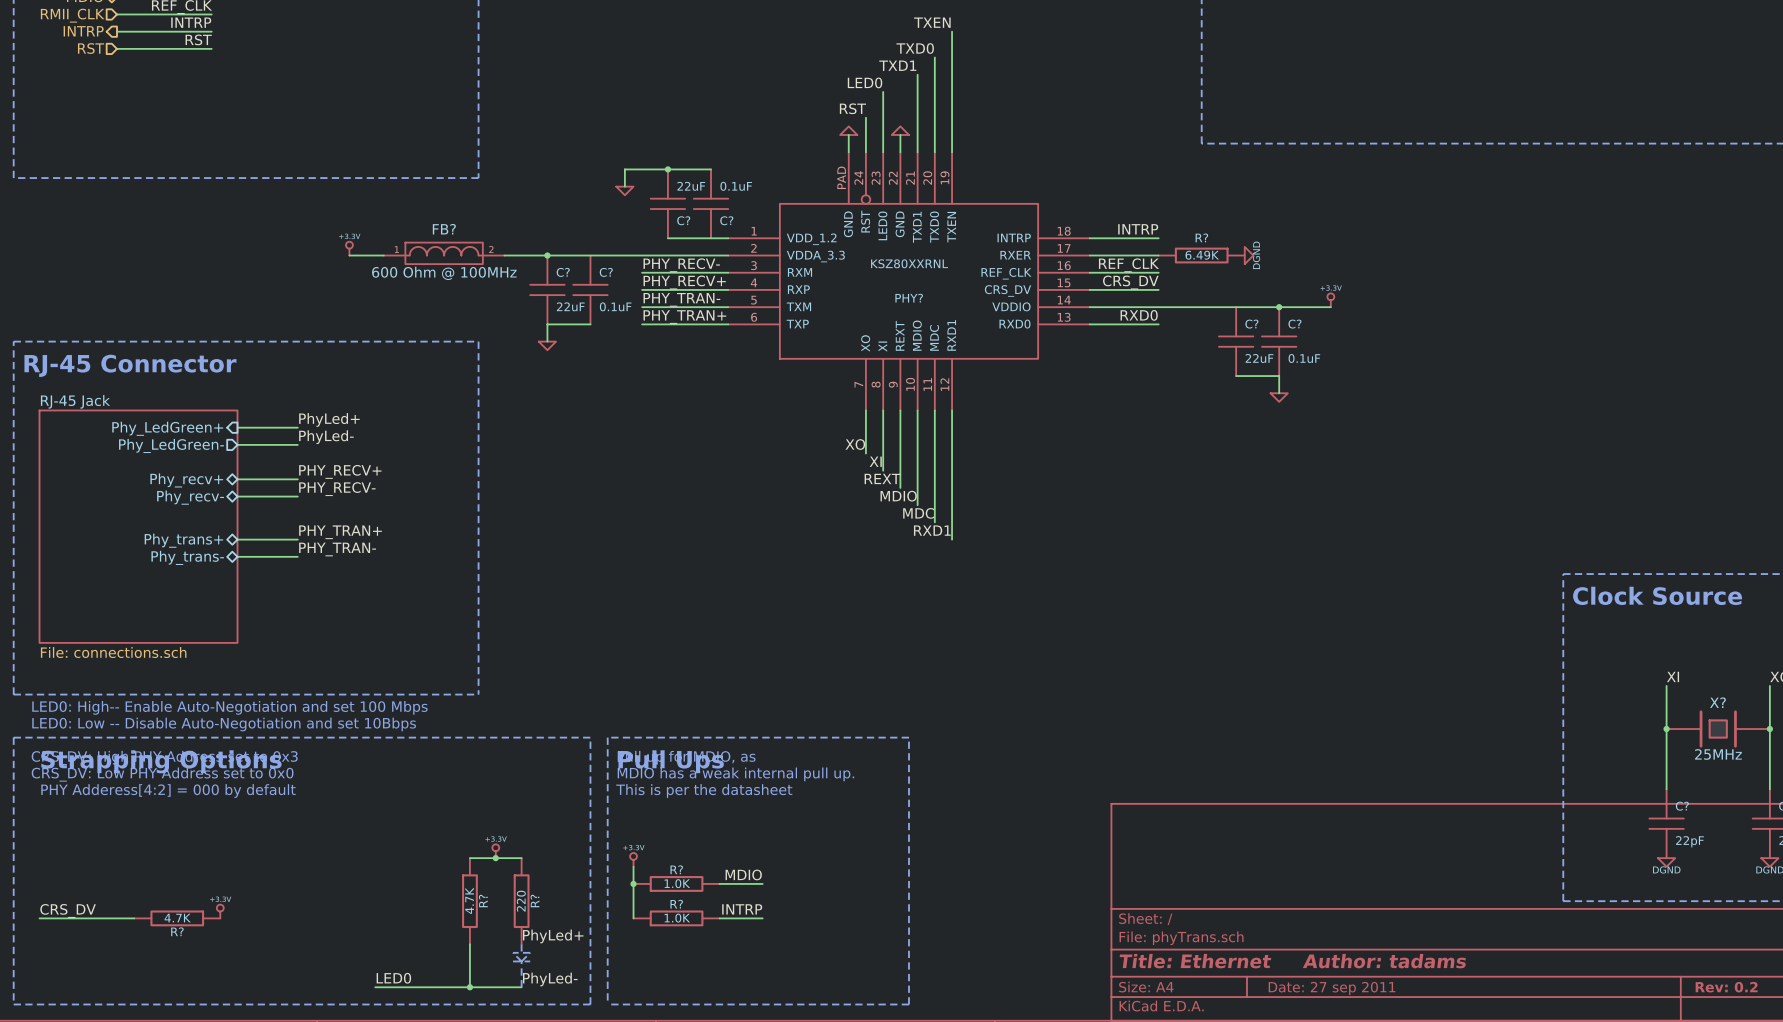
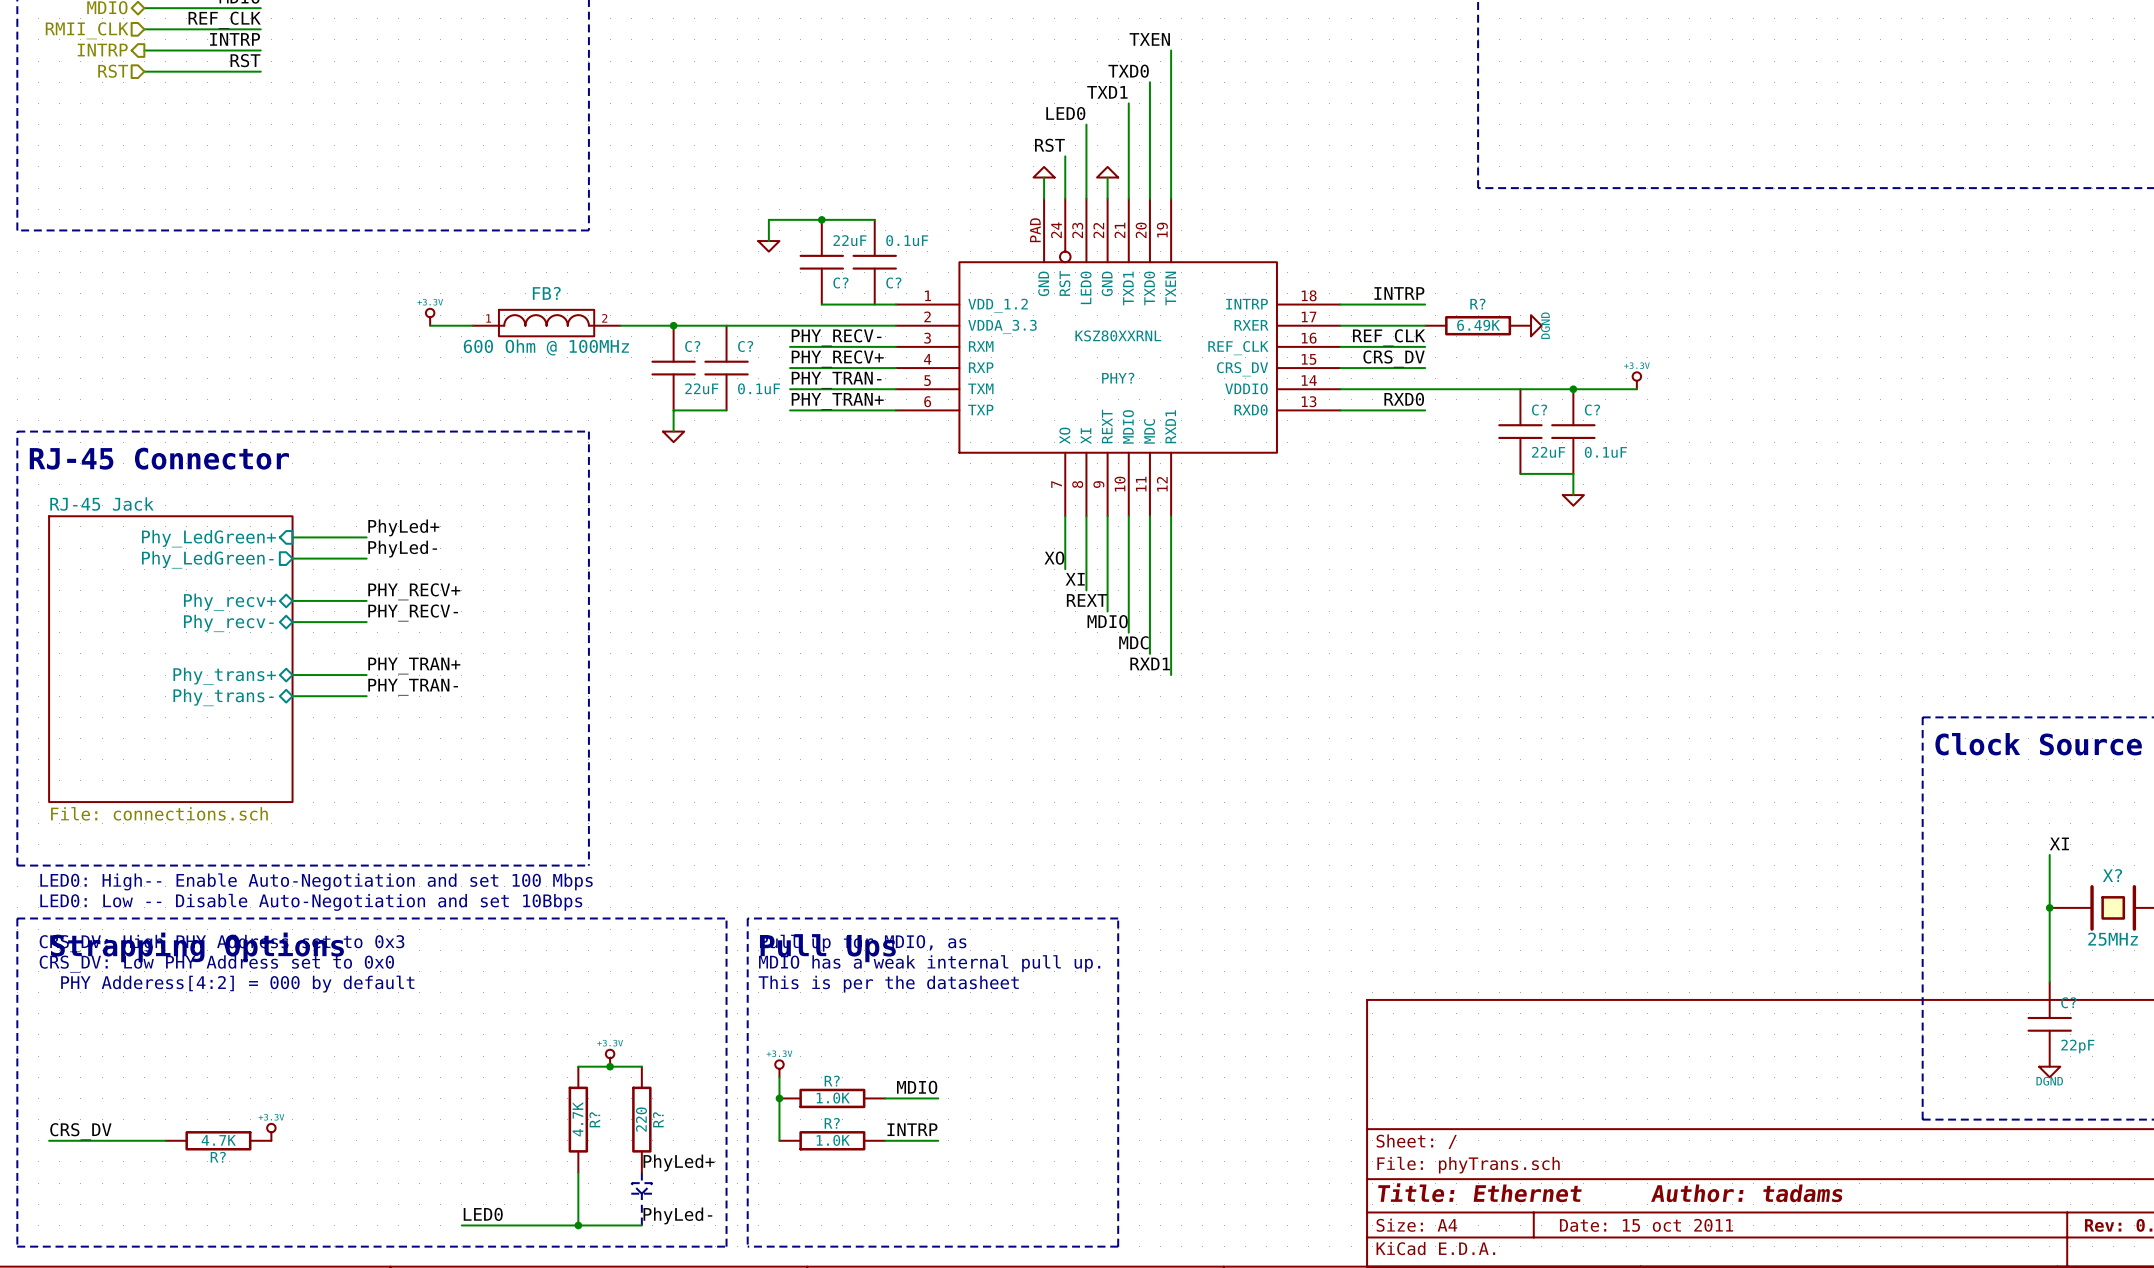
title block: Date: 27 sep 2011 (1332, 988) -> Date: 15 oct 2011 (1646, 1225)

